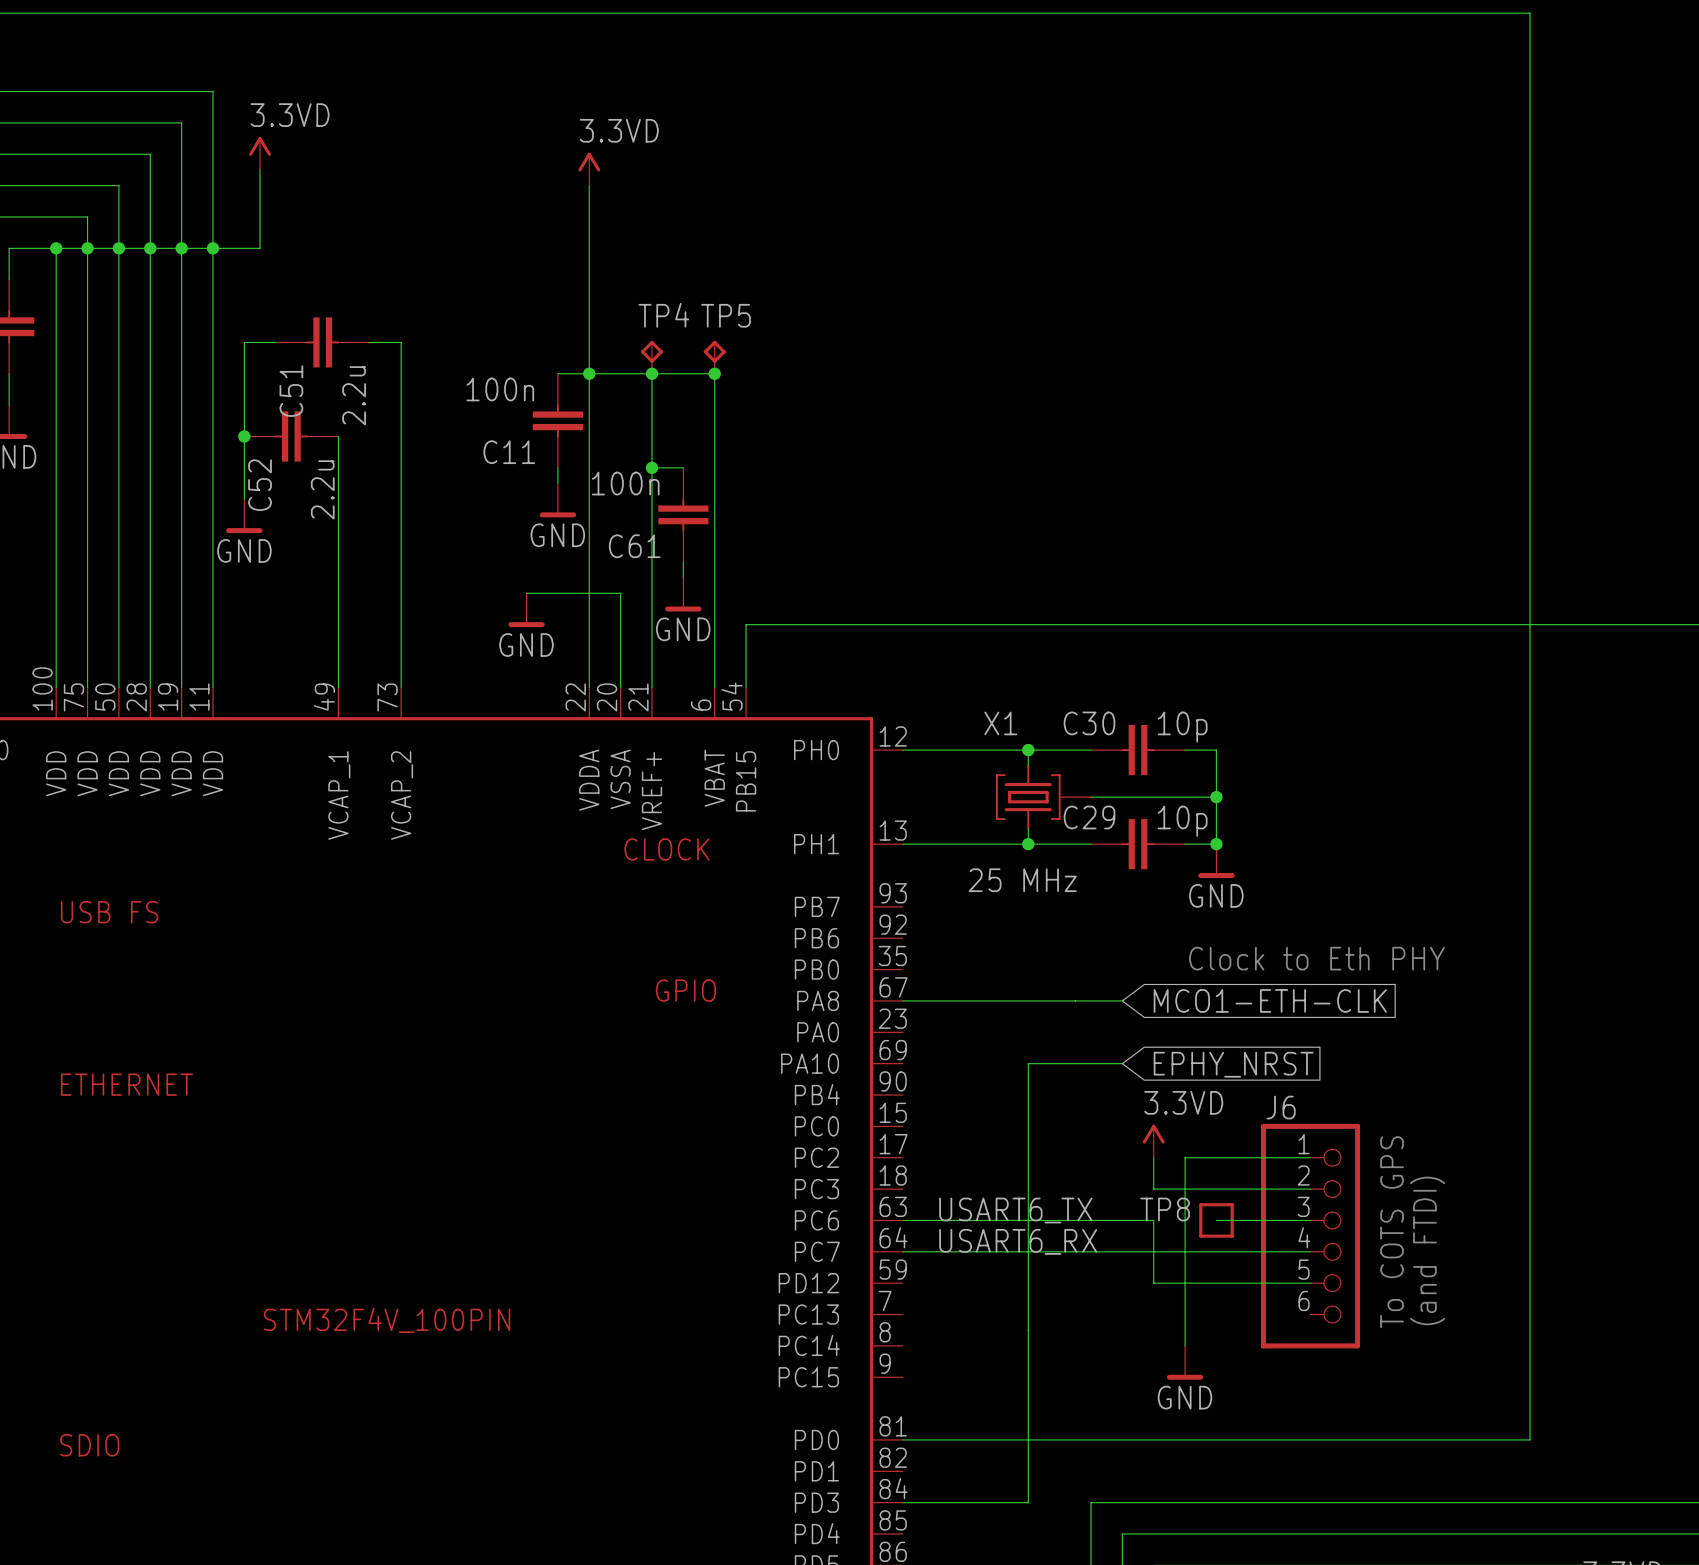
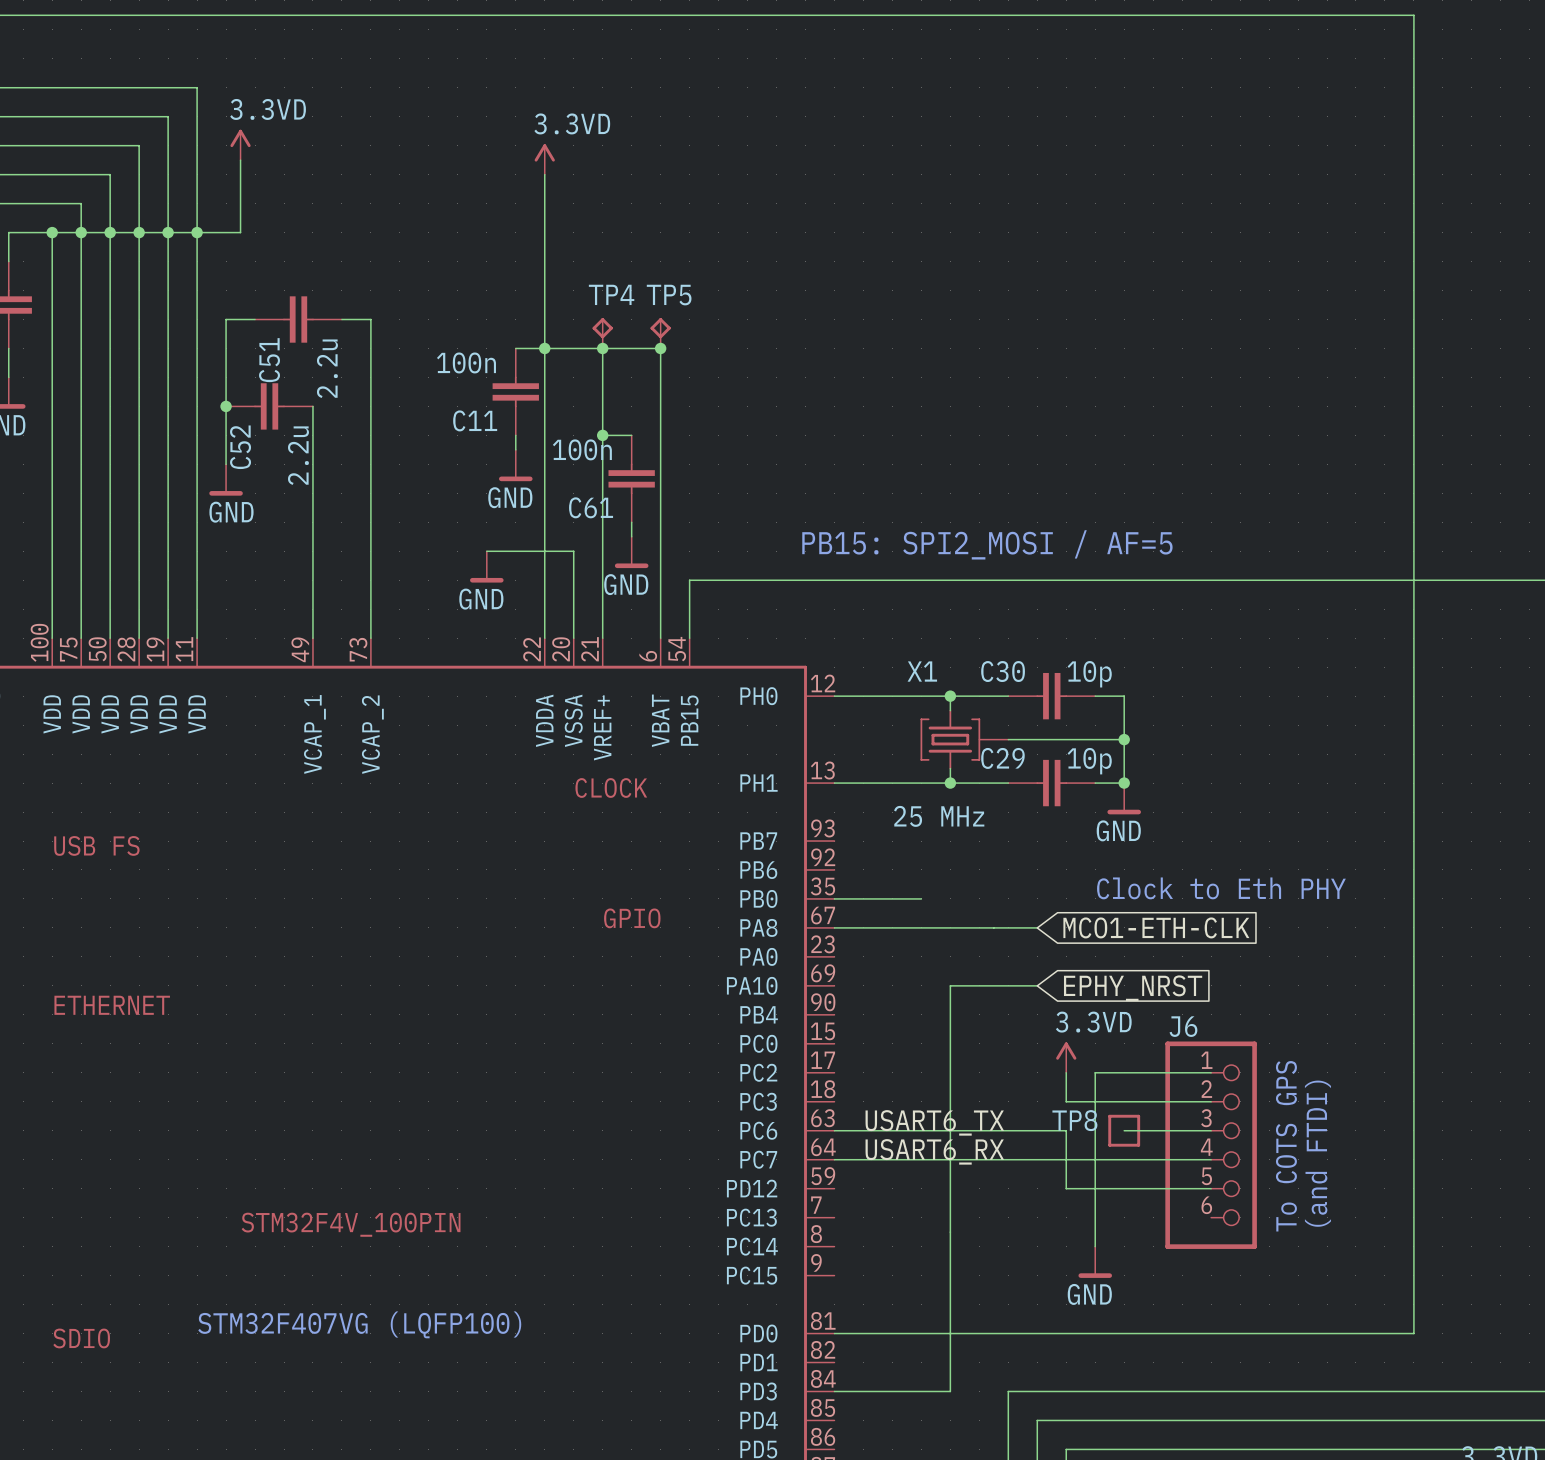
text: none -> PB15: SPI2_MOSI / AF=5 (987, 544)
wire: none -> (834, 898) (921, 898)
text: none -> STM32F407VG (LQFP100) (359, 1324)

